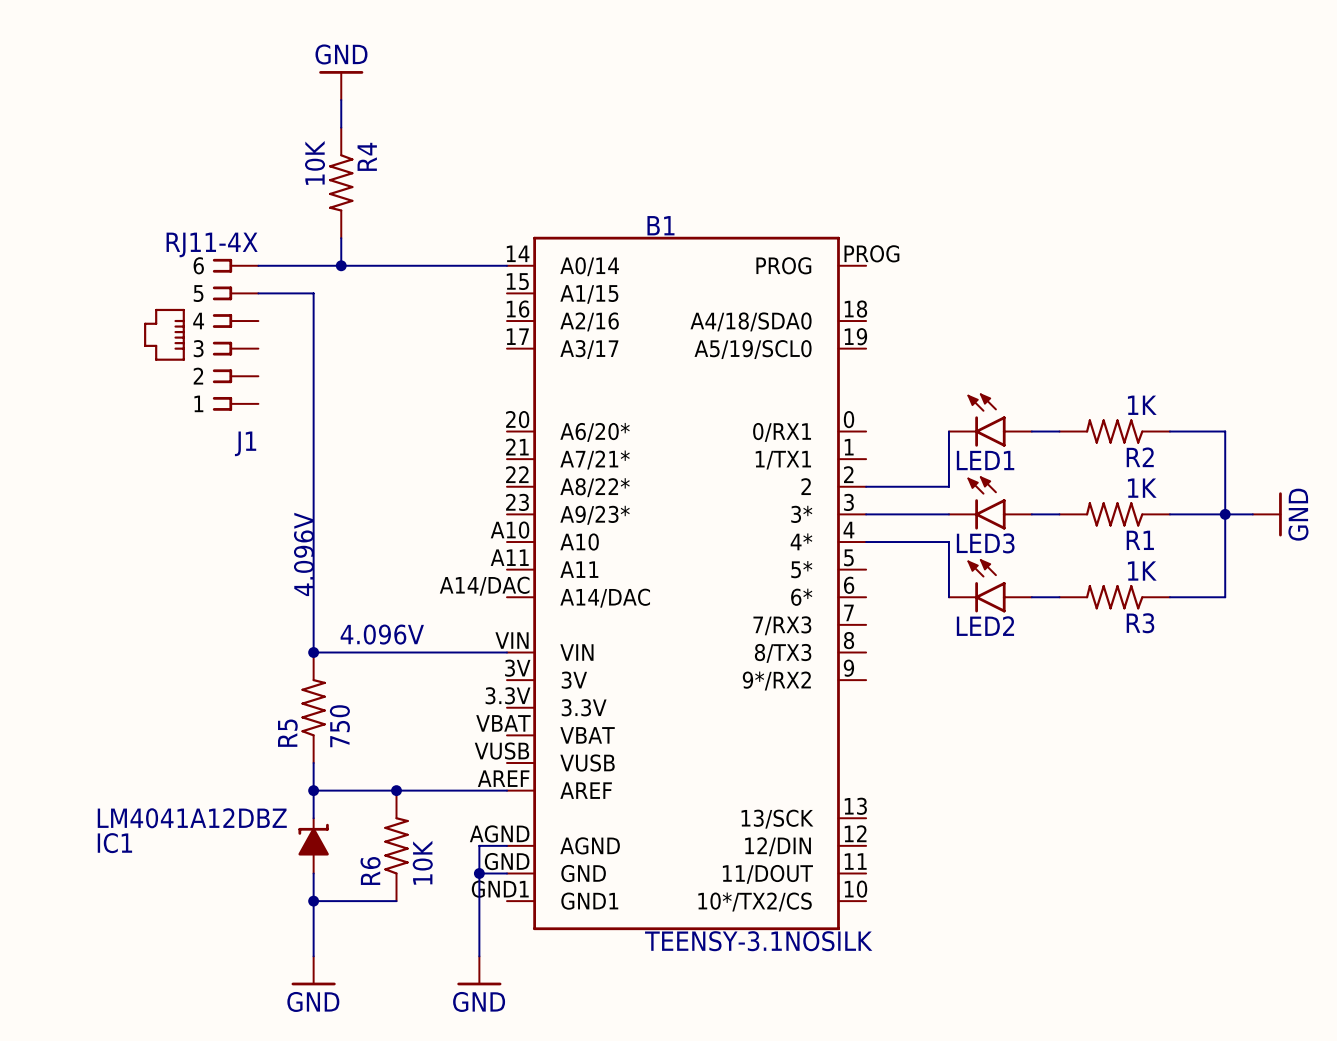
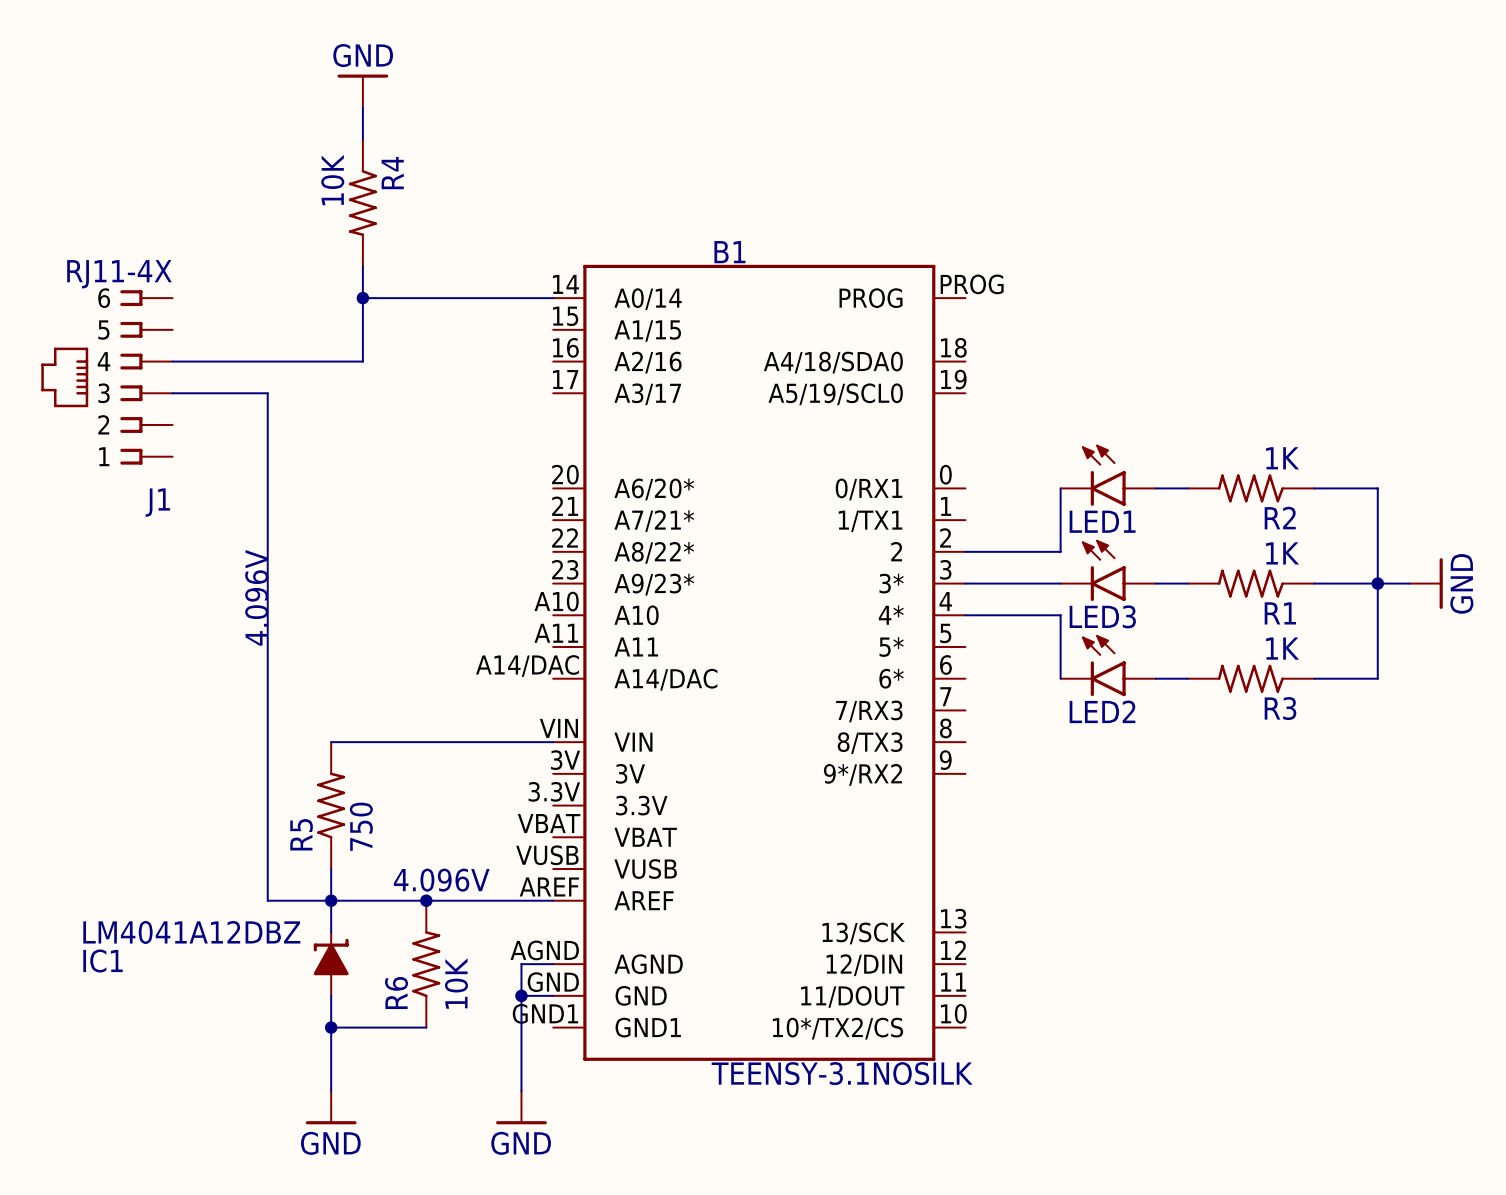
wire: (258, 265) (341, 265) -> (172, 361) (362, 361) (362, 298)
wire: (258, 293) (313, 293) (313, 652) -> none
J1 position: (201, 334) -> (106, 377)
wire: none -> (172, 393) (267, 393) (267, 900) (331, 900)
text position: 4.096V (303, 554) -> 4.096V (256, 597)
text: 4.096V (382, 634) -> none
junction: (313, 652) -> none
text: none -> 4.096V (441, 880)

